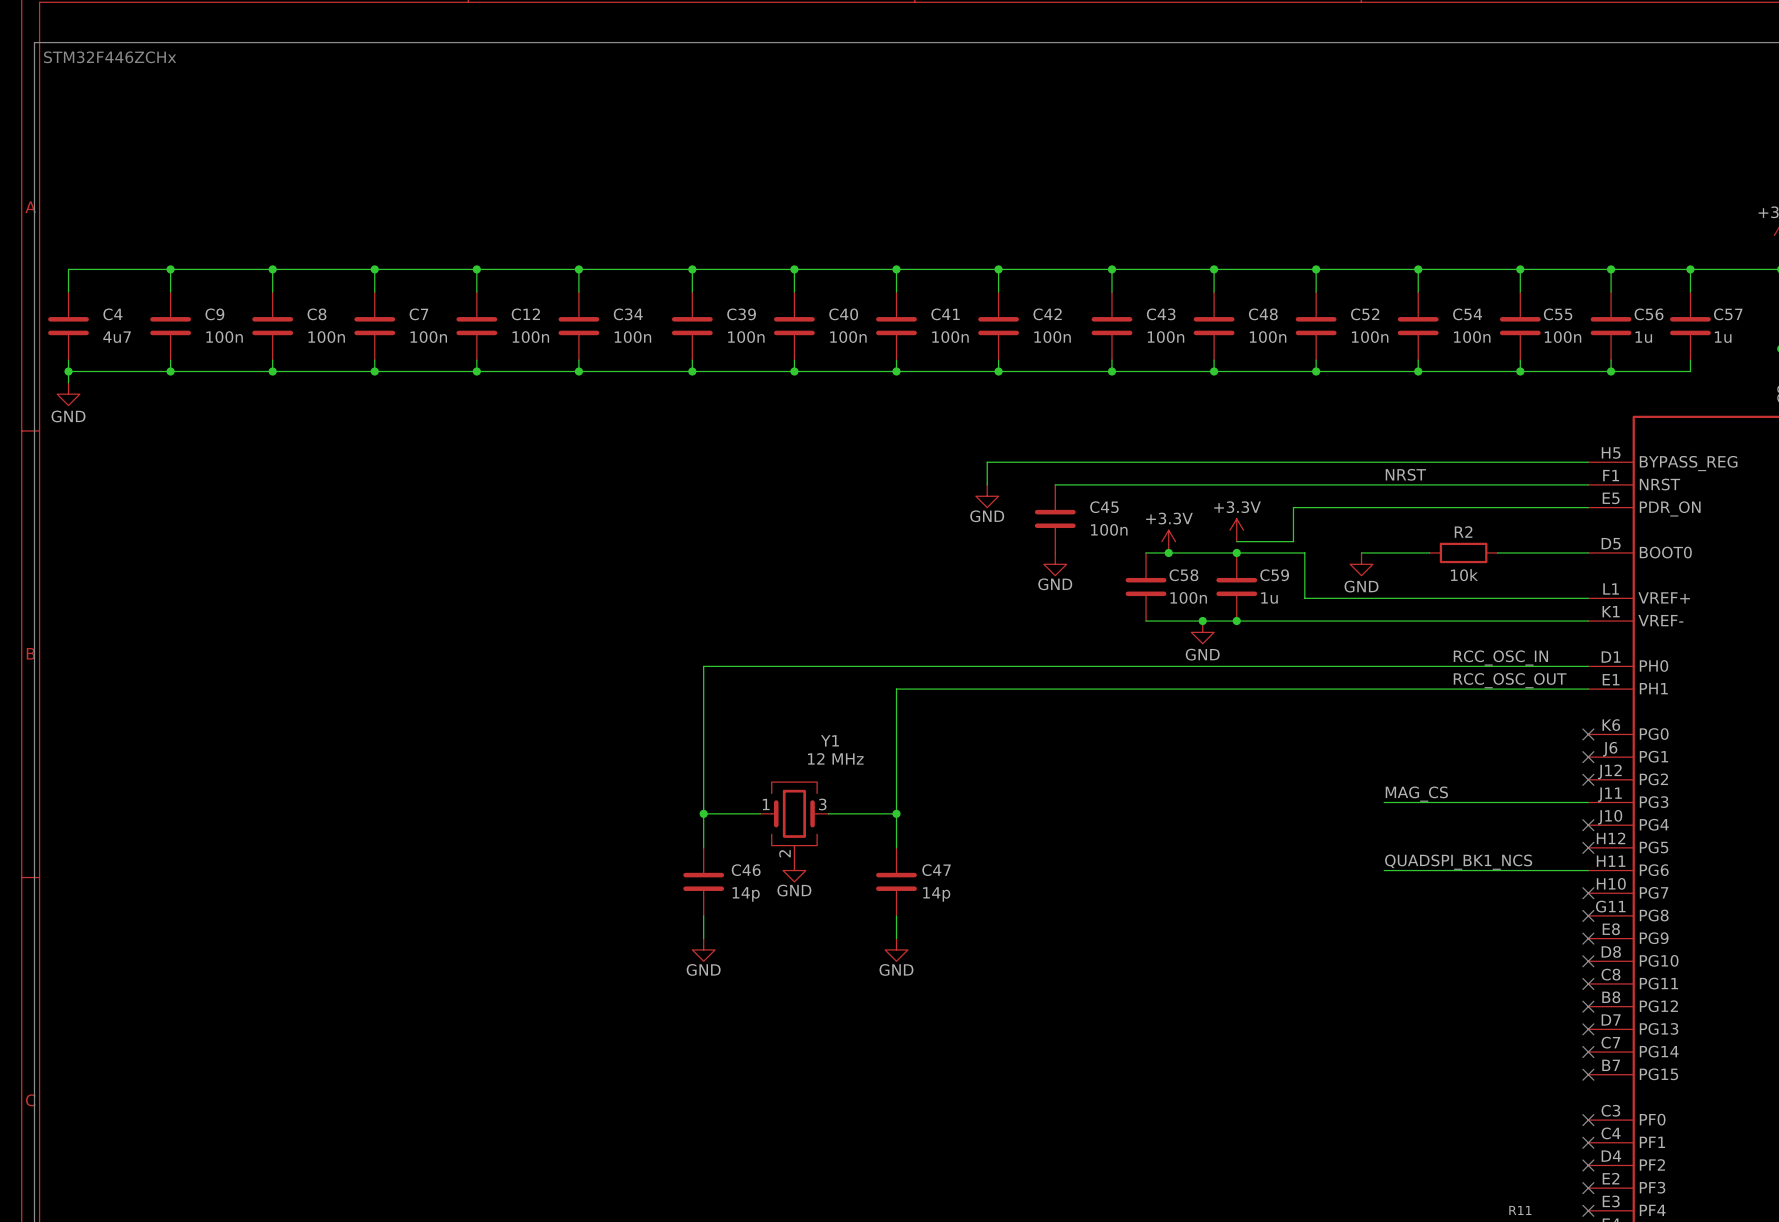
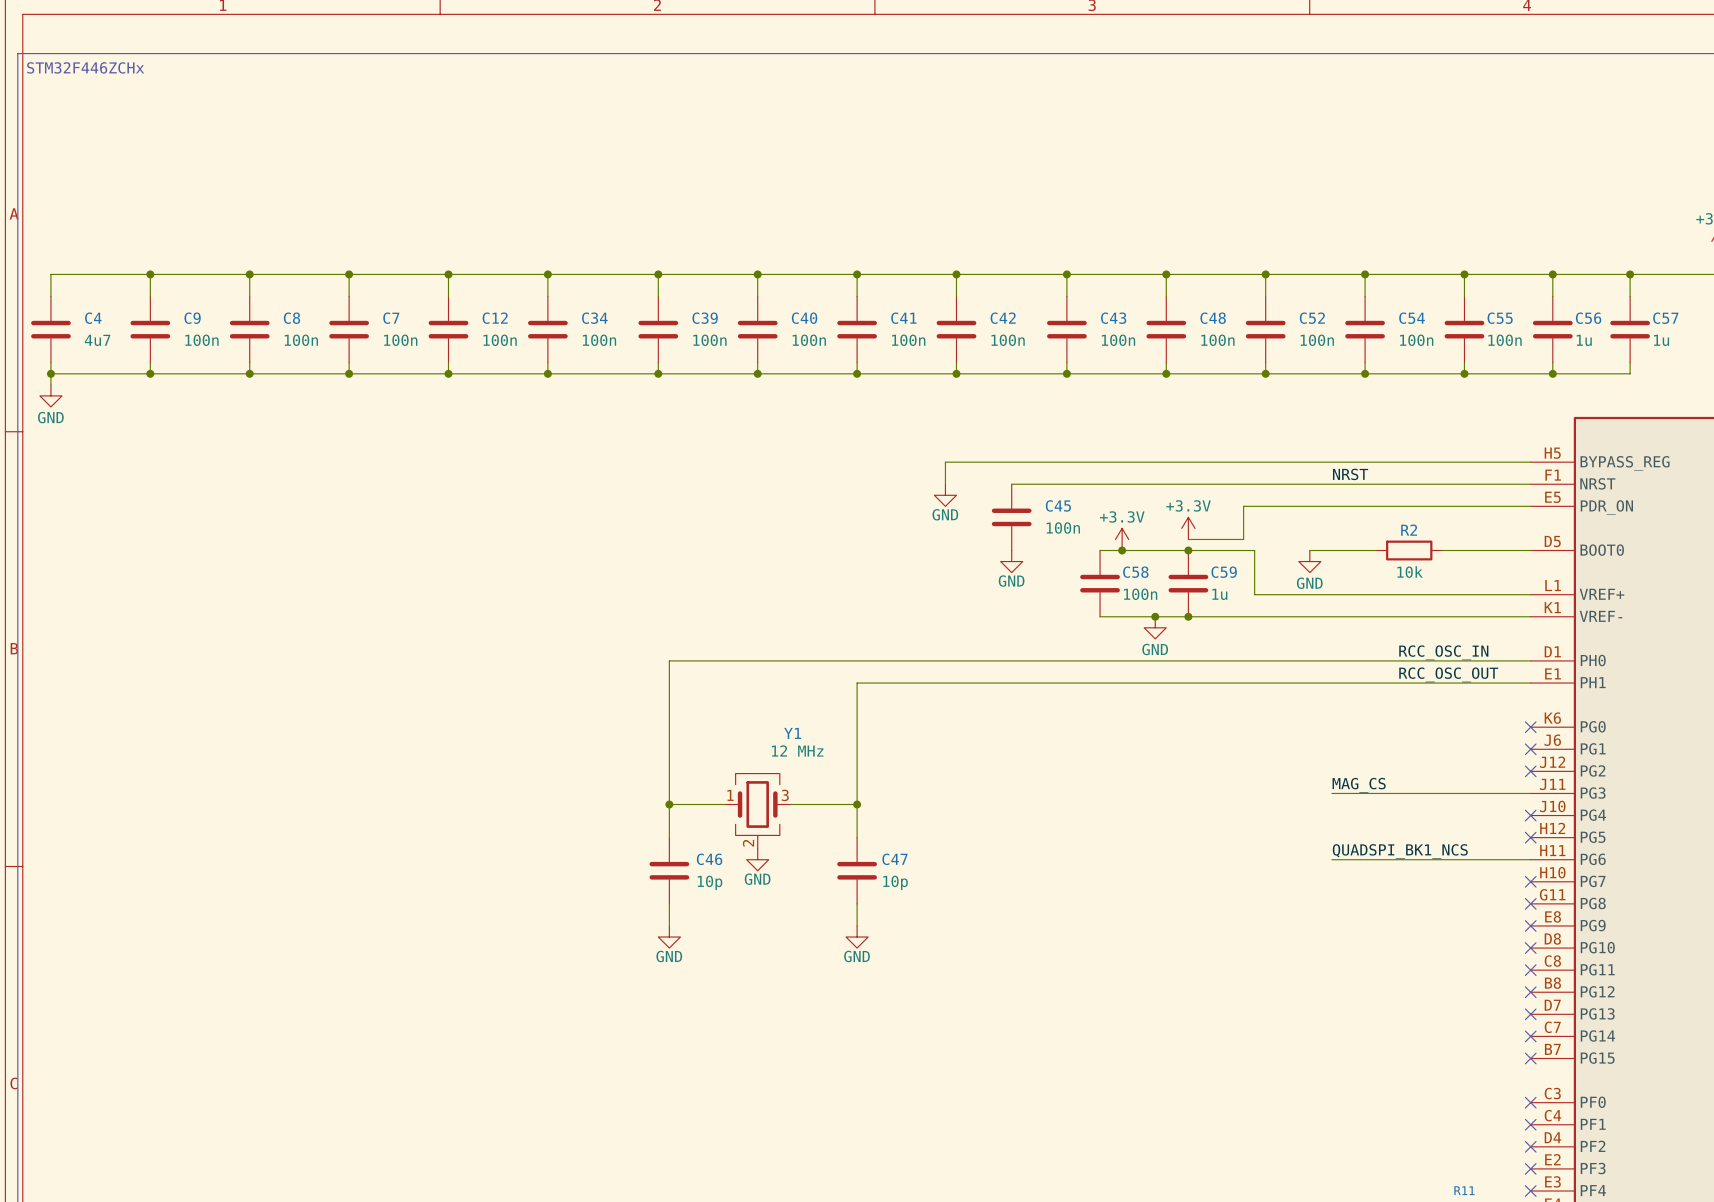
C46 value: 14p (746, 894) -> 10p (709, 882)
C47 value: 14p (936, 894) -> 10p (895, 882)

